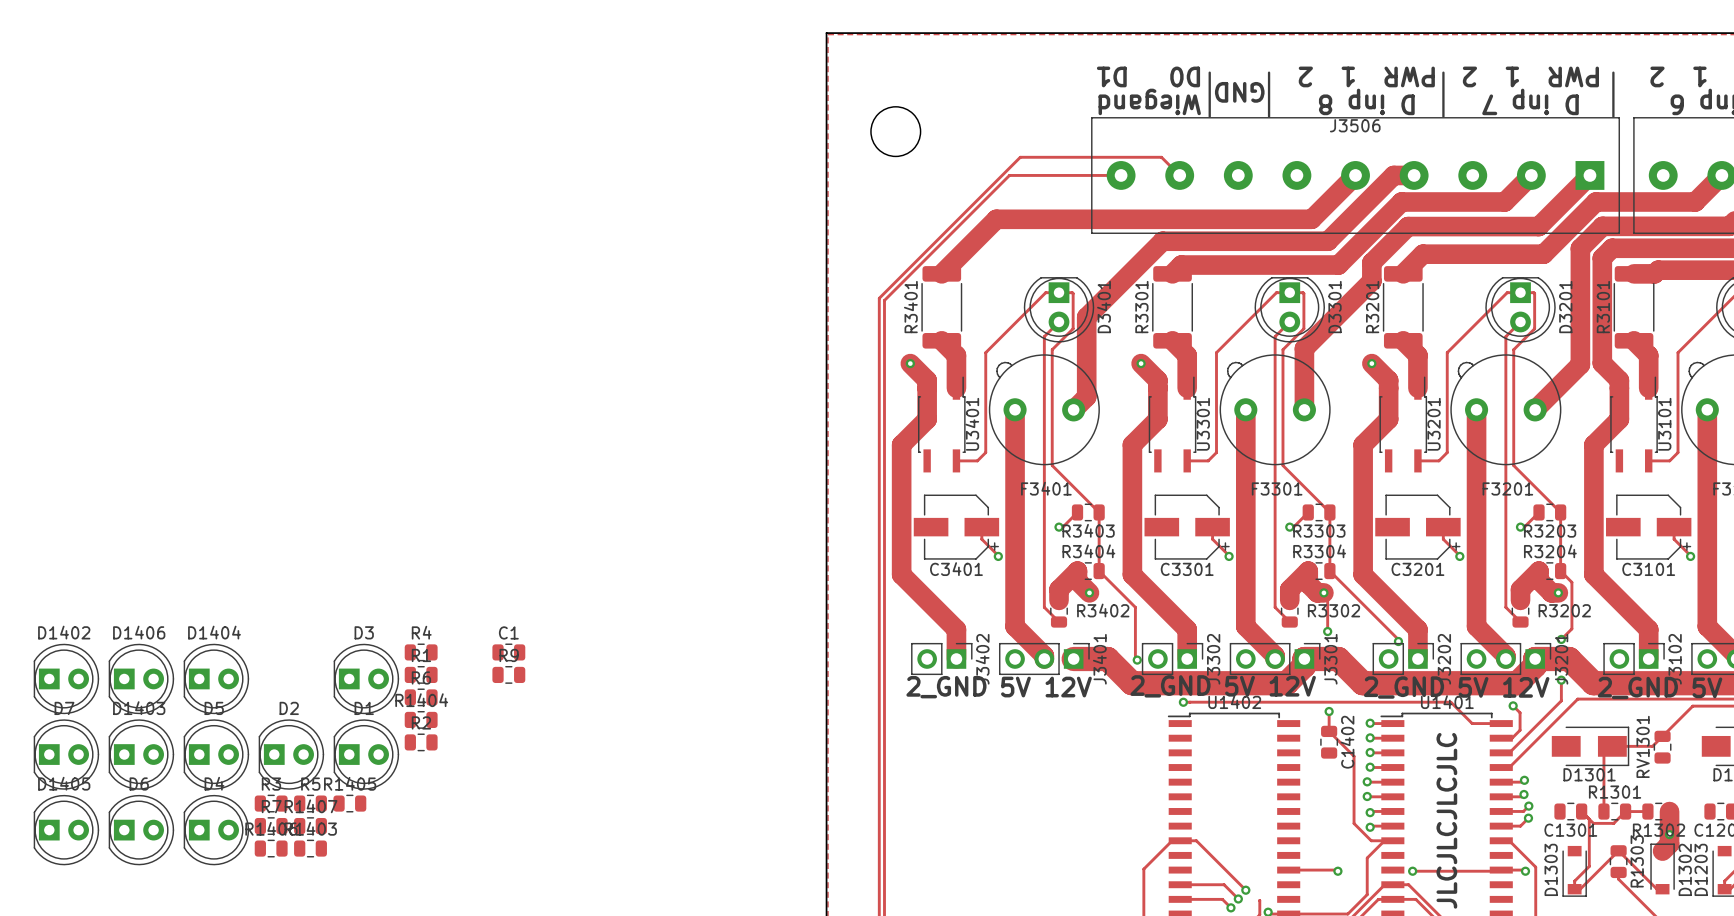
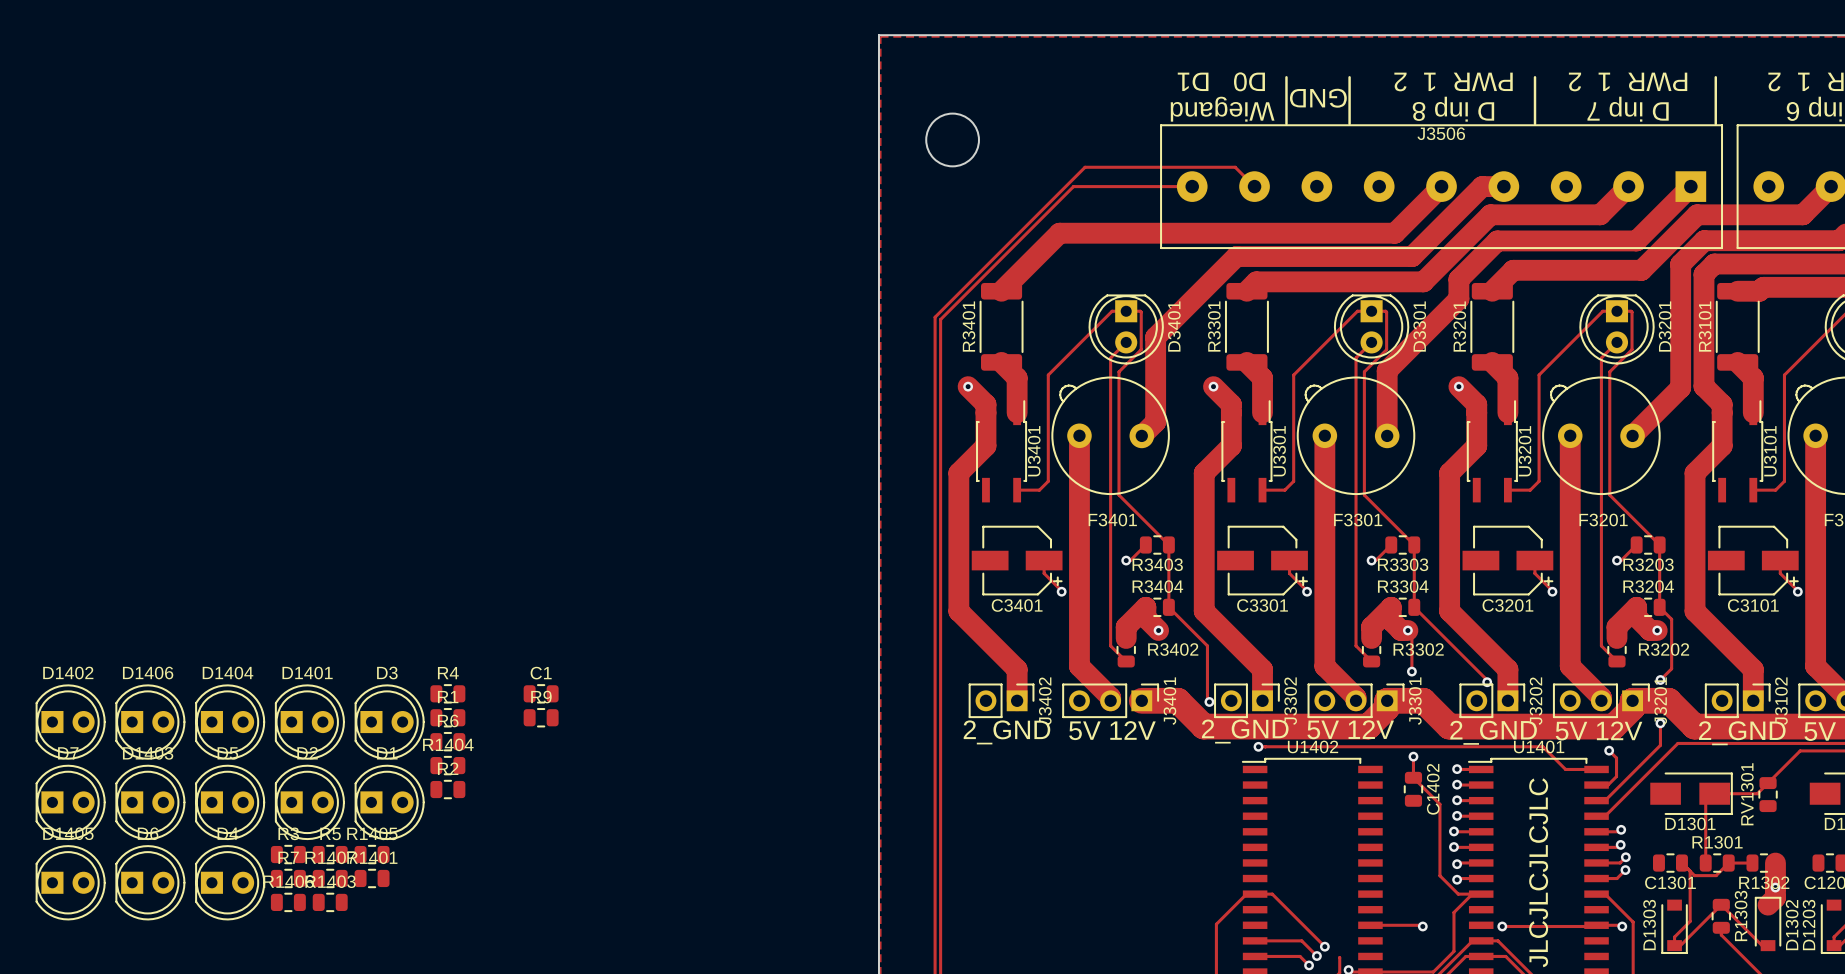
D1401: none -> (309, 722)
R1401: none -> (372, 878)

